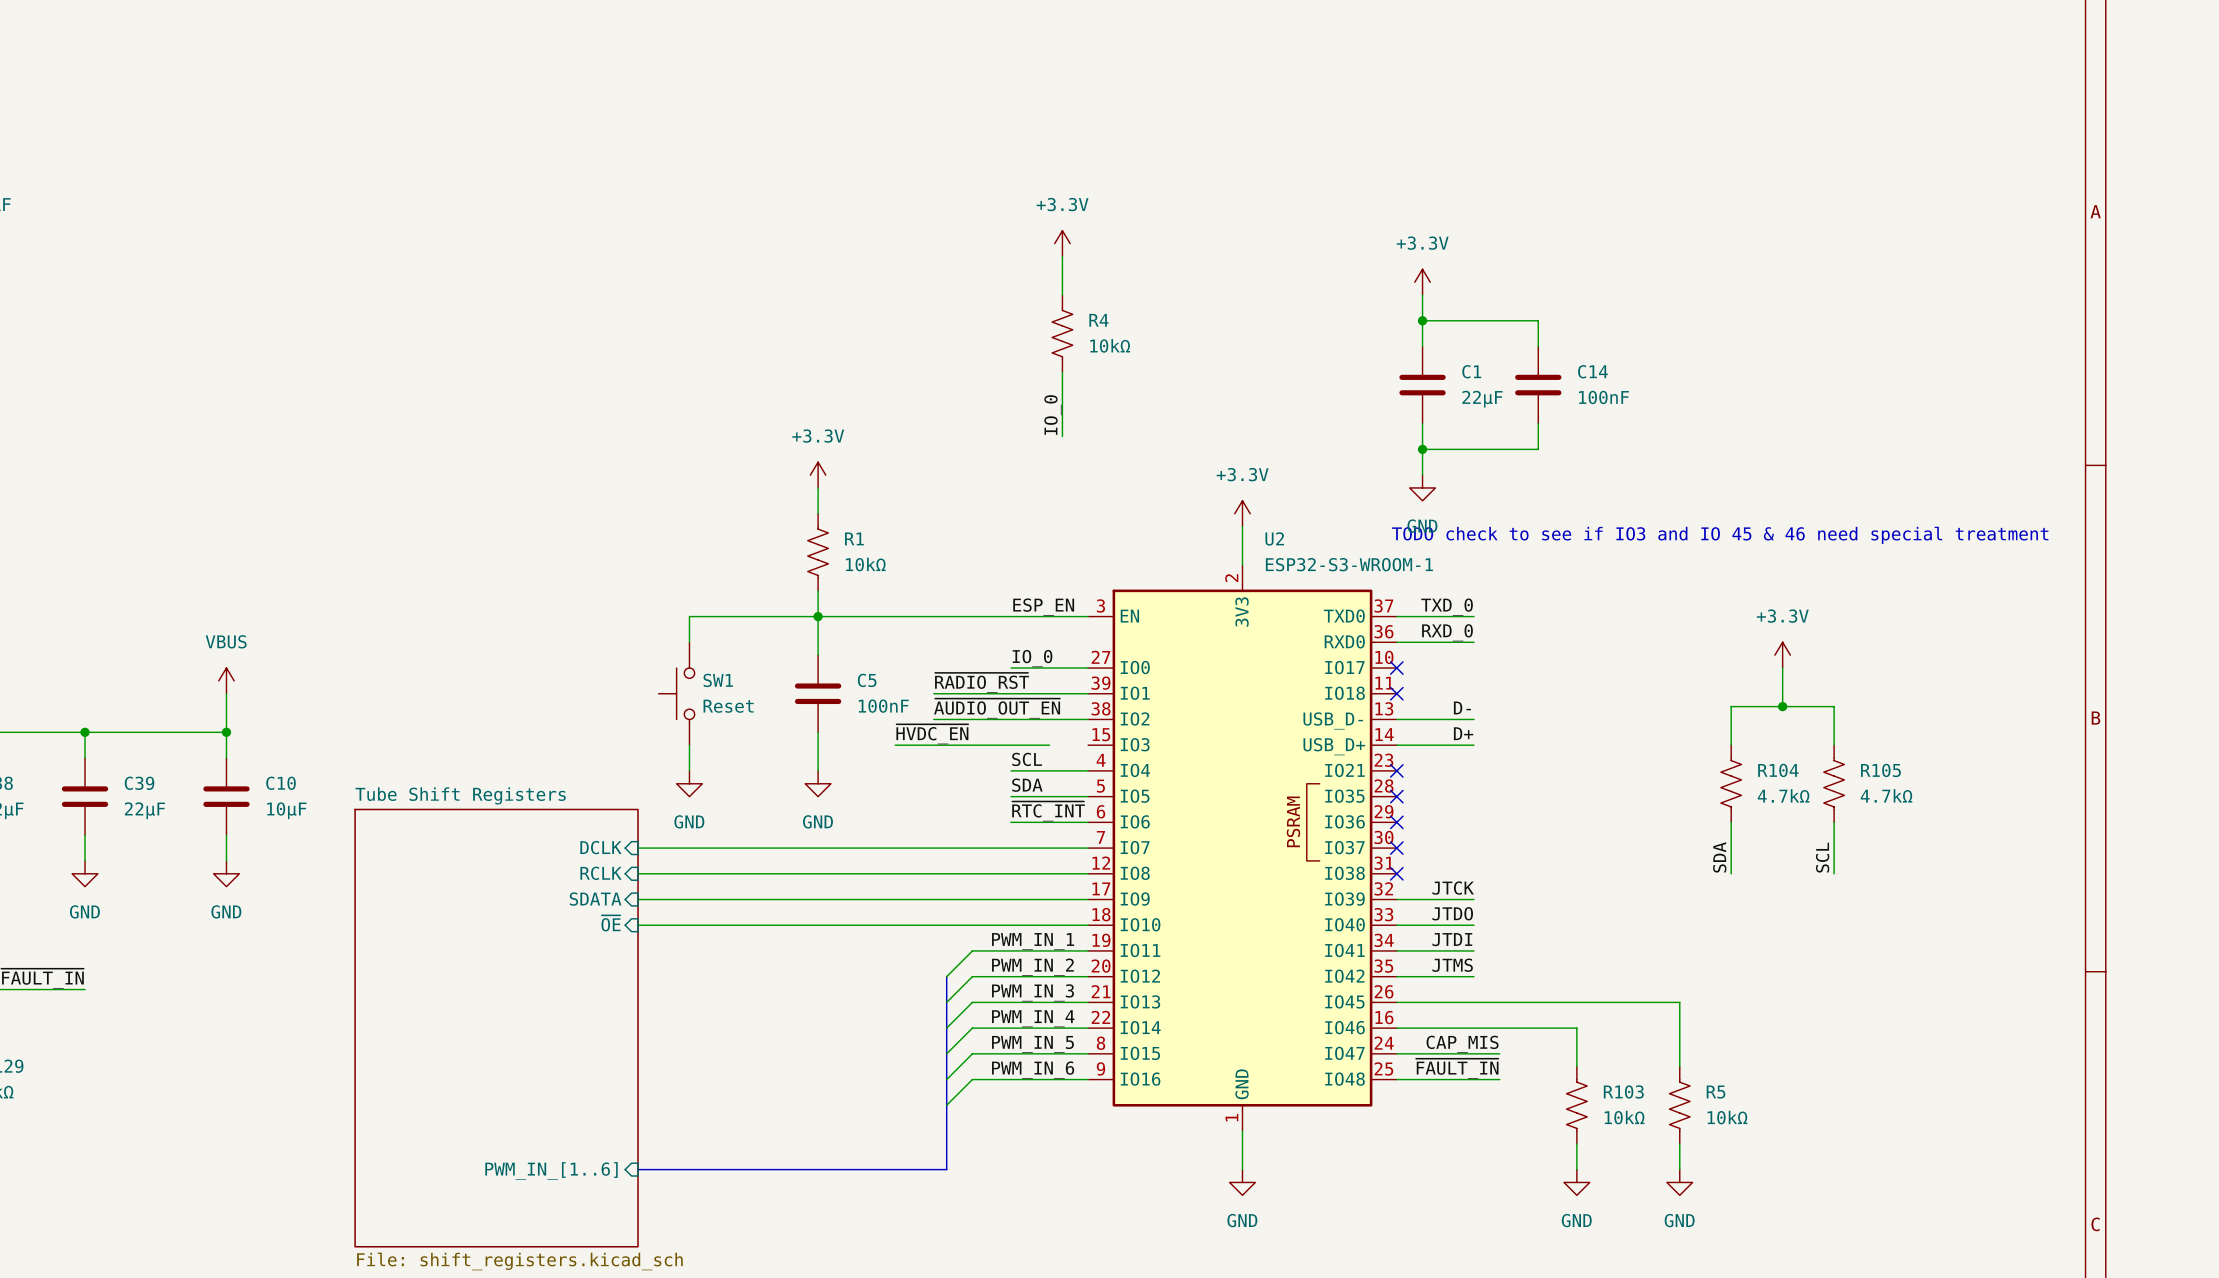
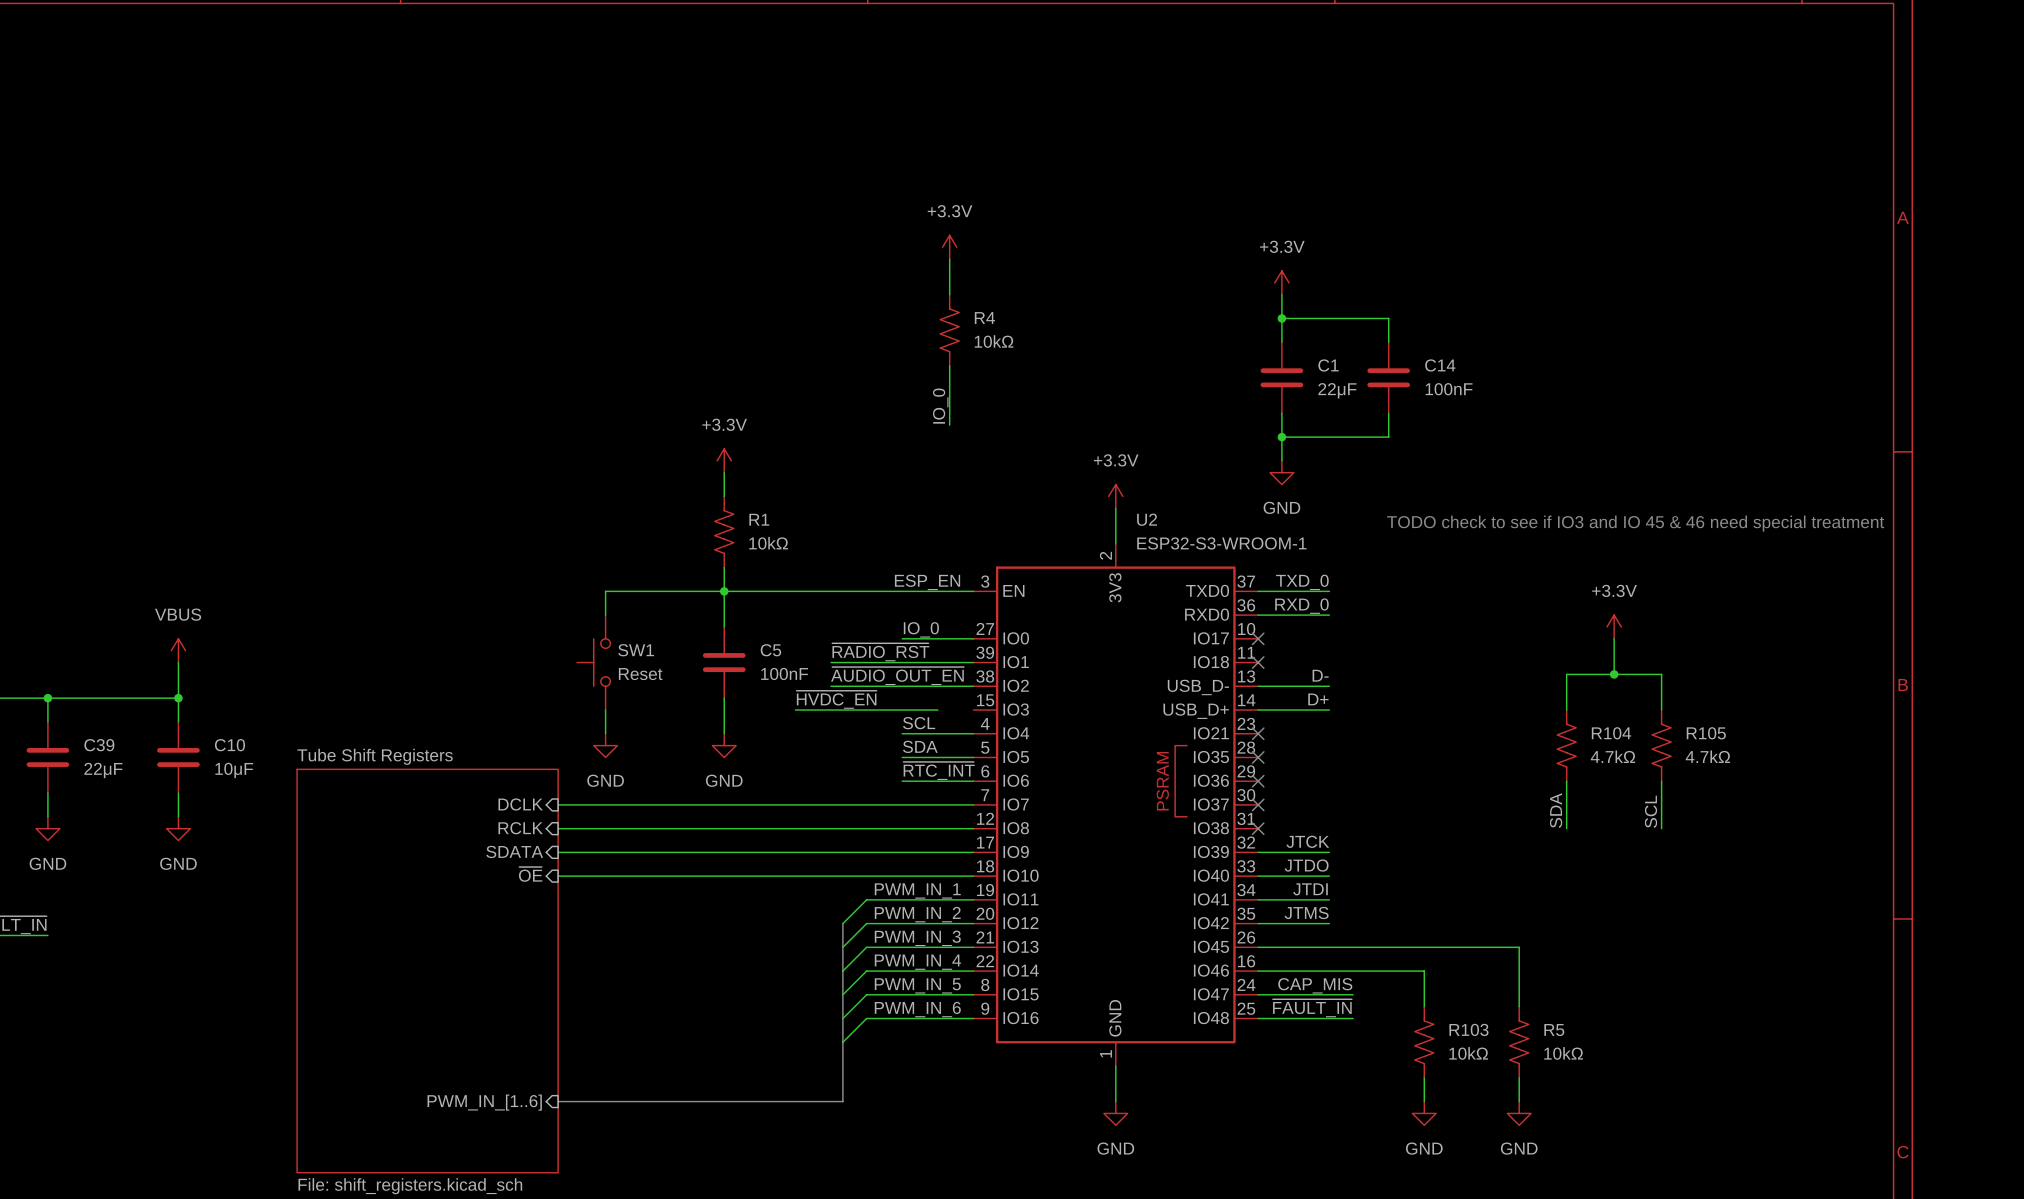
text position: TODO check to see if IO3 and IO 45 & 46 need special treatment (1720, 535) -> TODO check to see if IO3 and IO 45 & 46 need special treatment (1635, 523)

